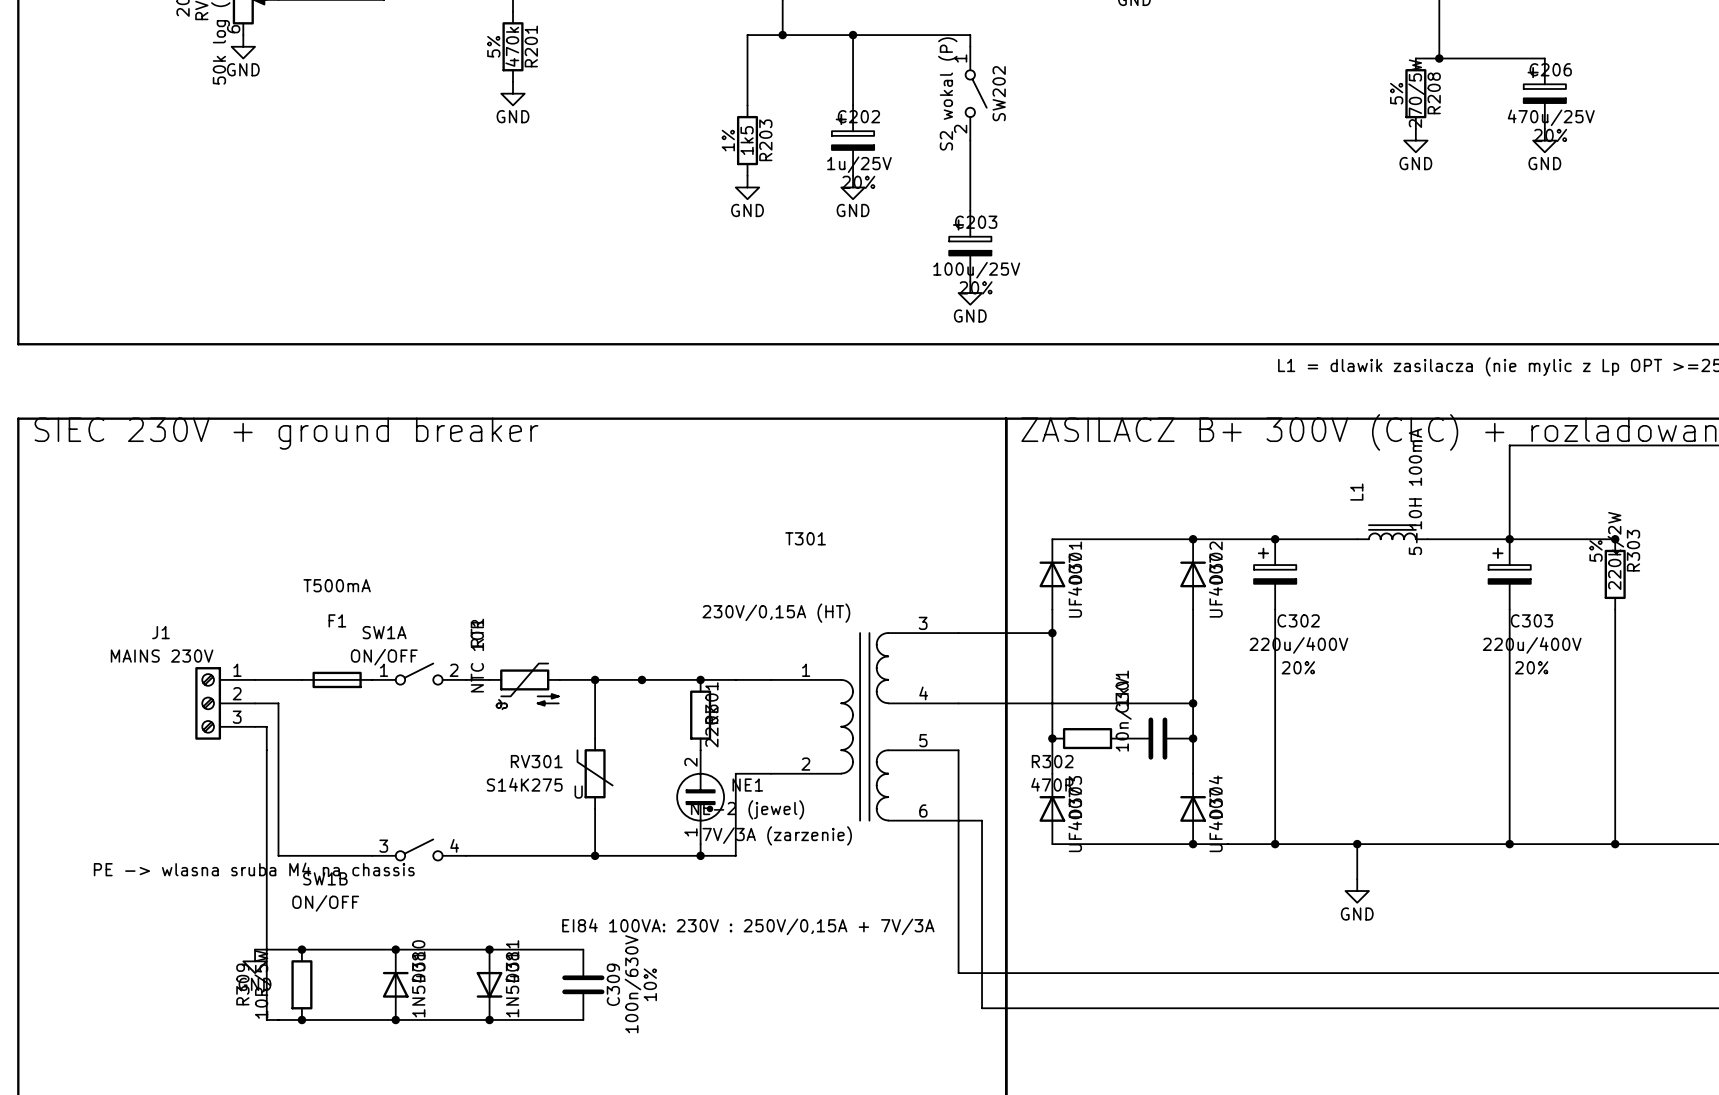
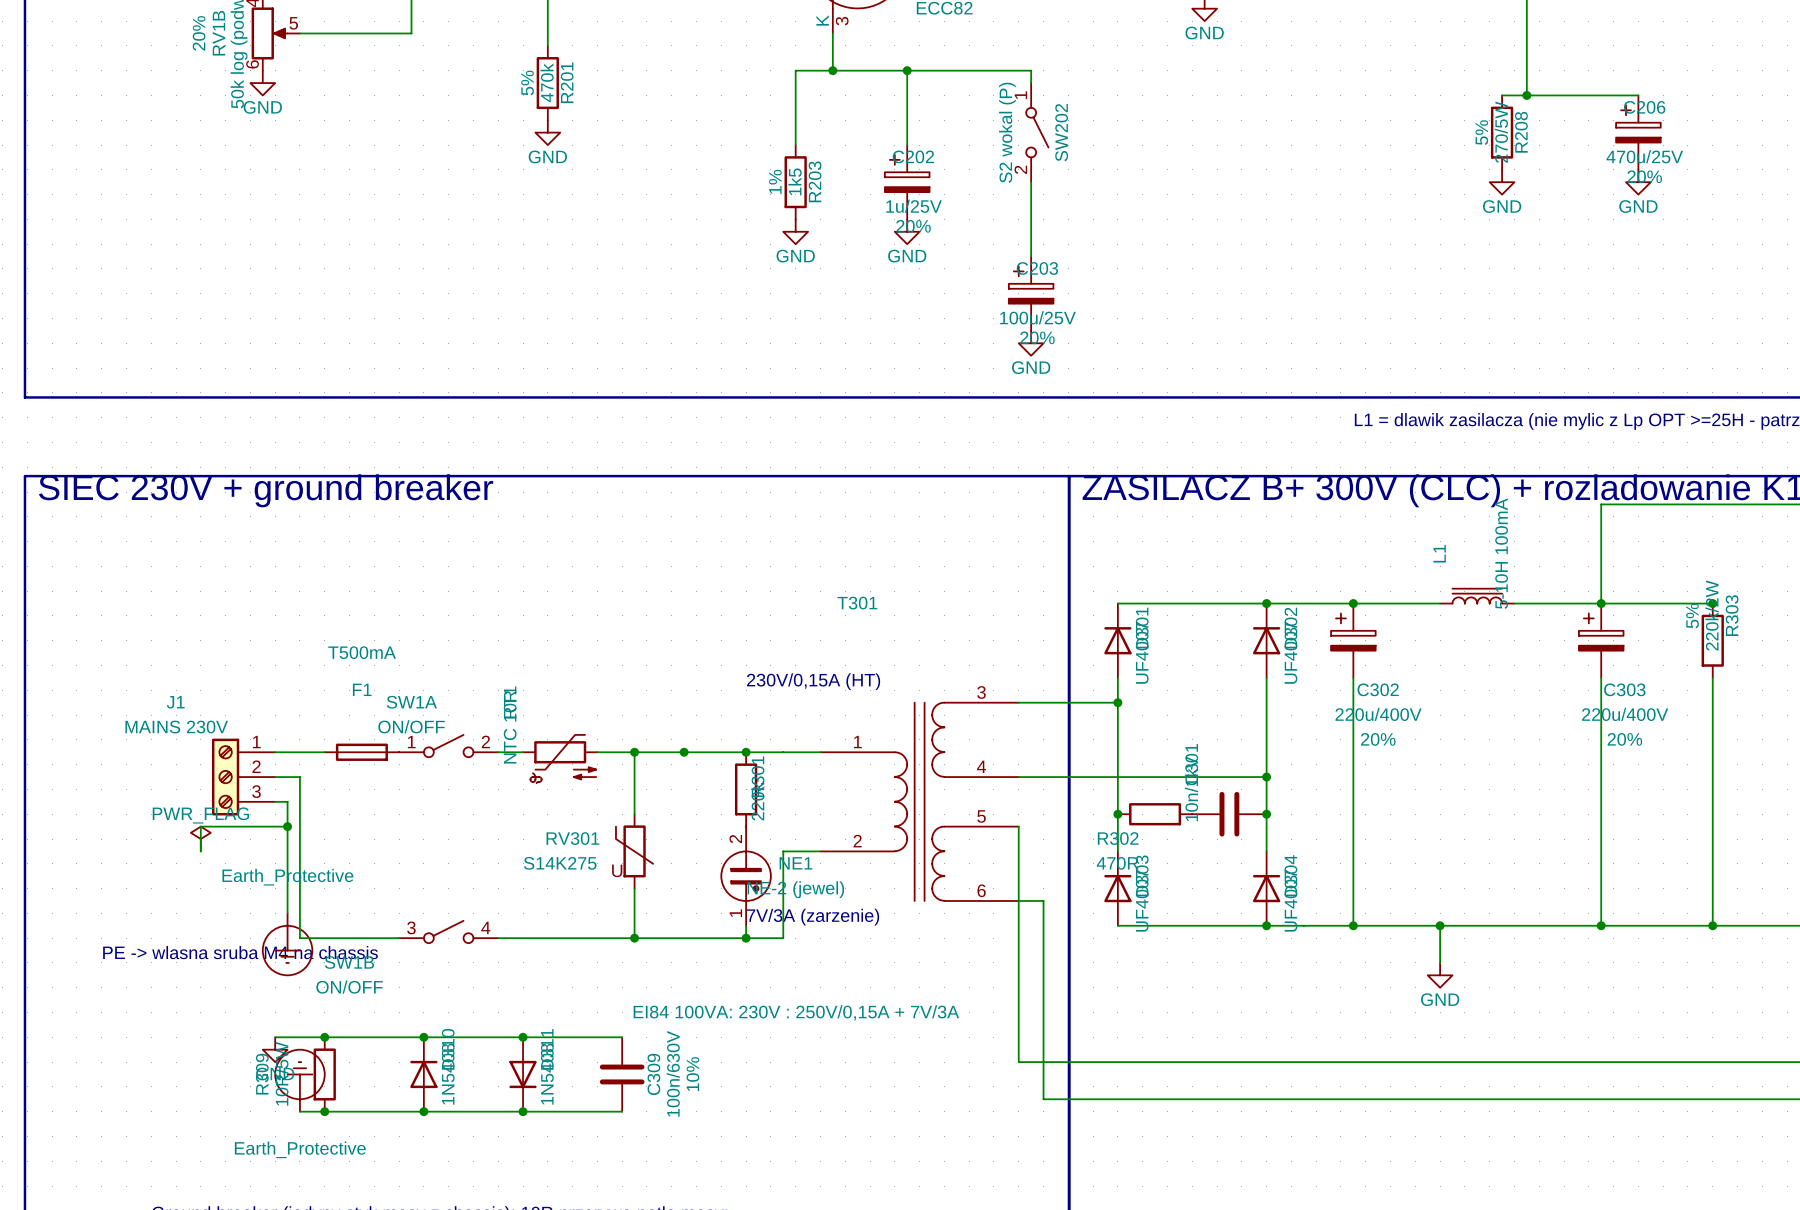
wire: none -> (287, 826) (200, 826) (200, 851)
junction: none -> (287, 826)
power symbol: none -> PWR_FLAG (200, 839)
wire: (266, 832) (266, 1019) (278, 1019) -> none
power symbol: none -> Earth_Protective (287, 944)
power symbol: none -> Earth_Protective (299, 1080)

